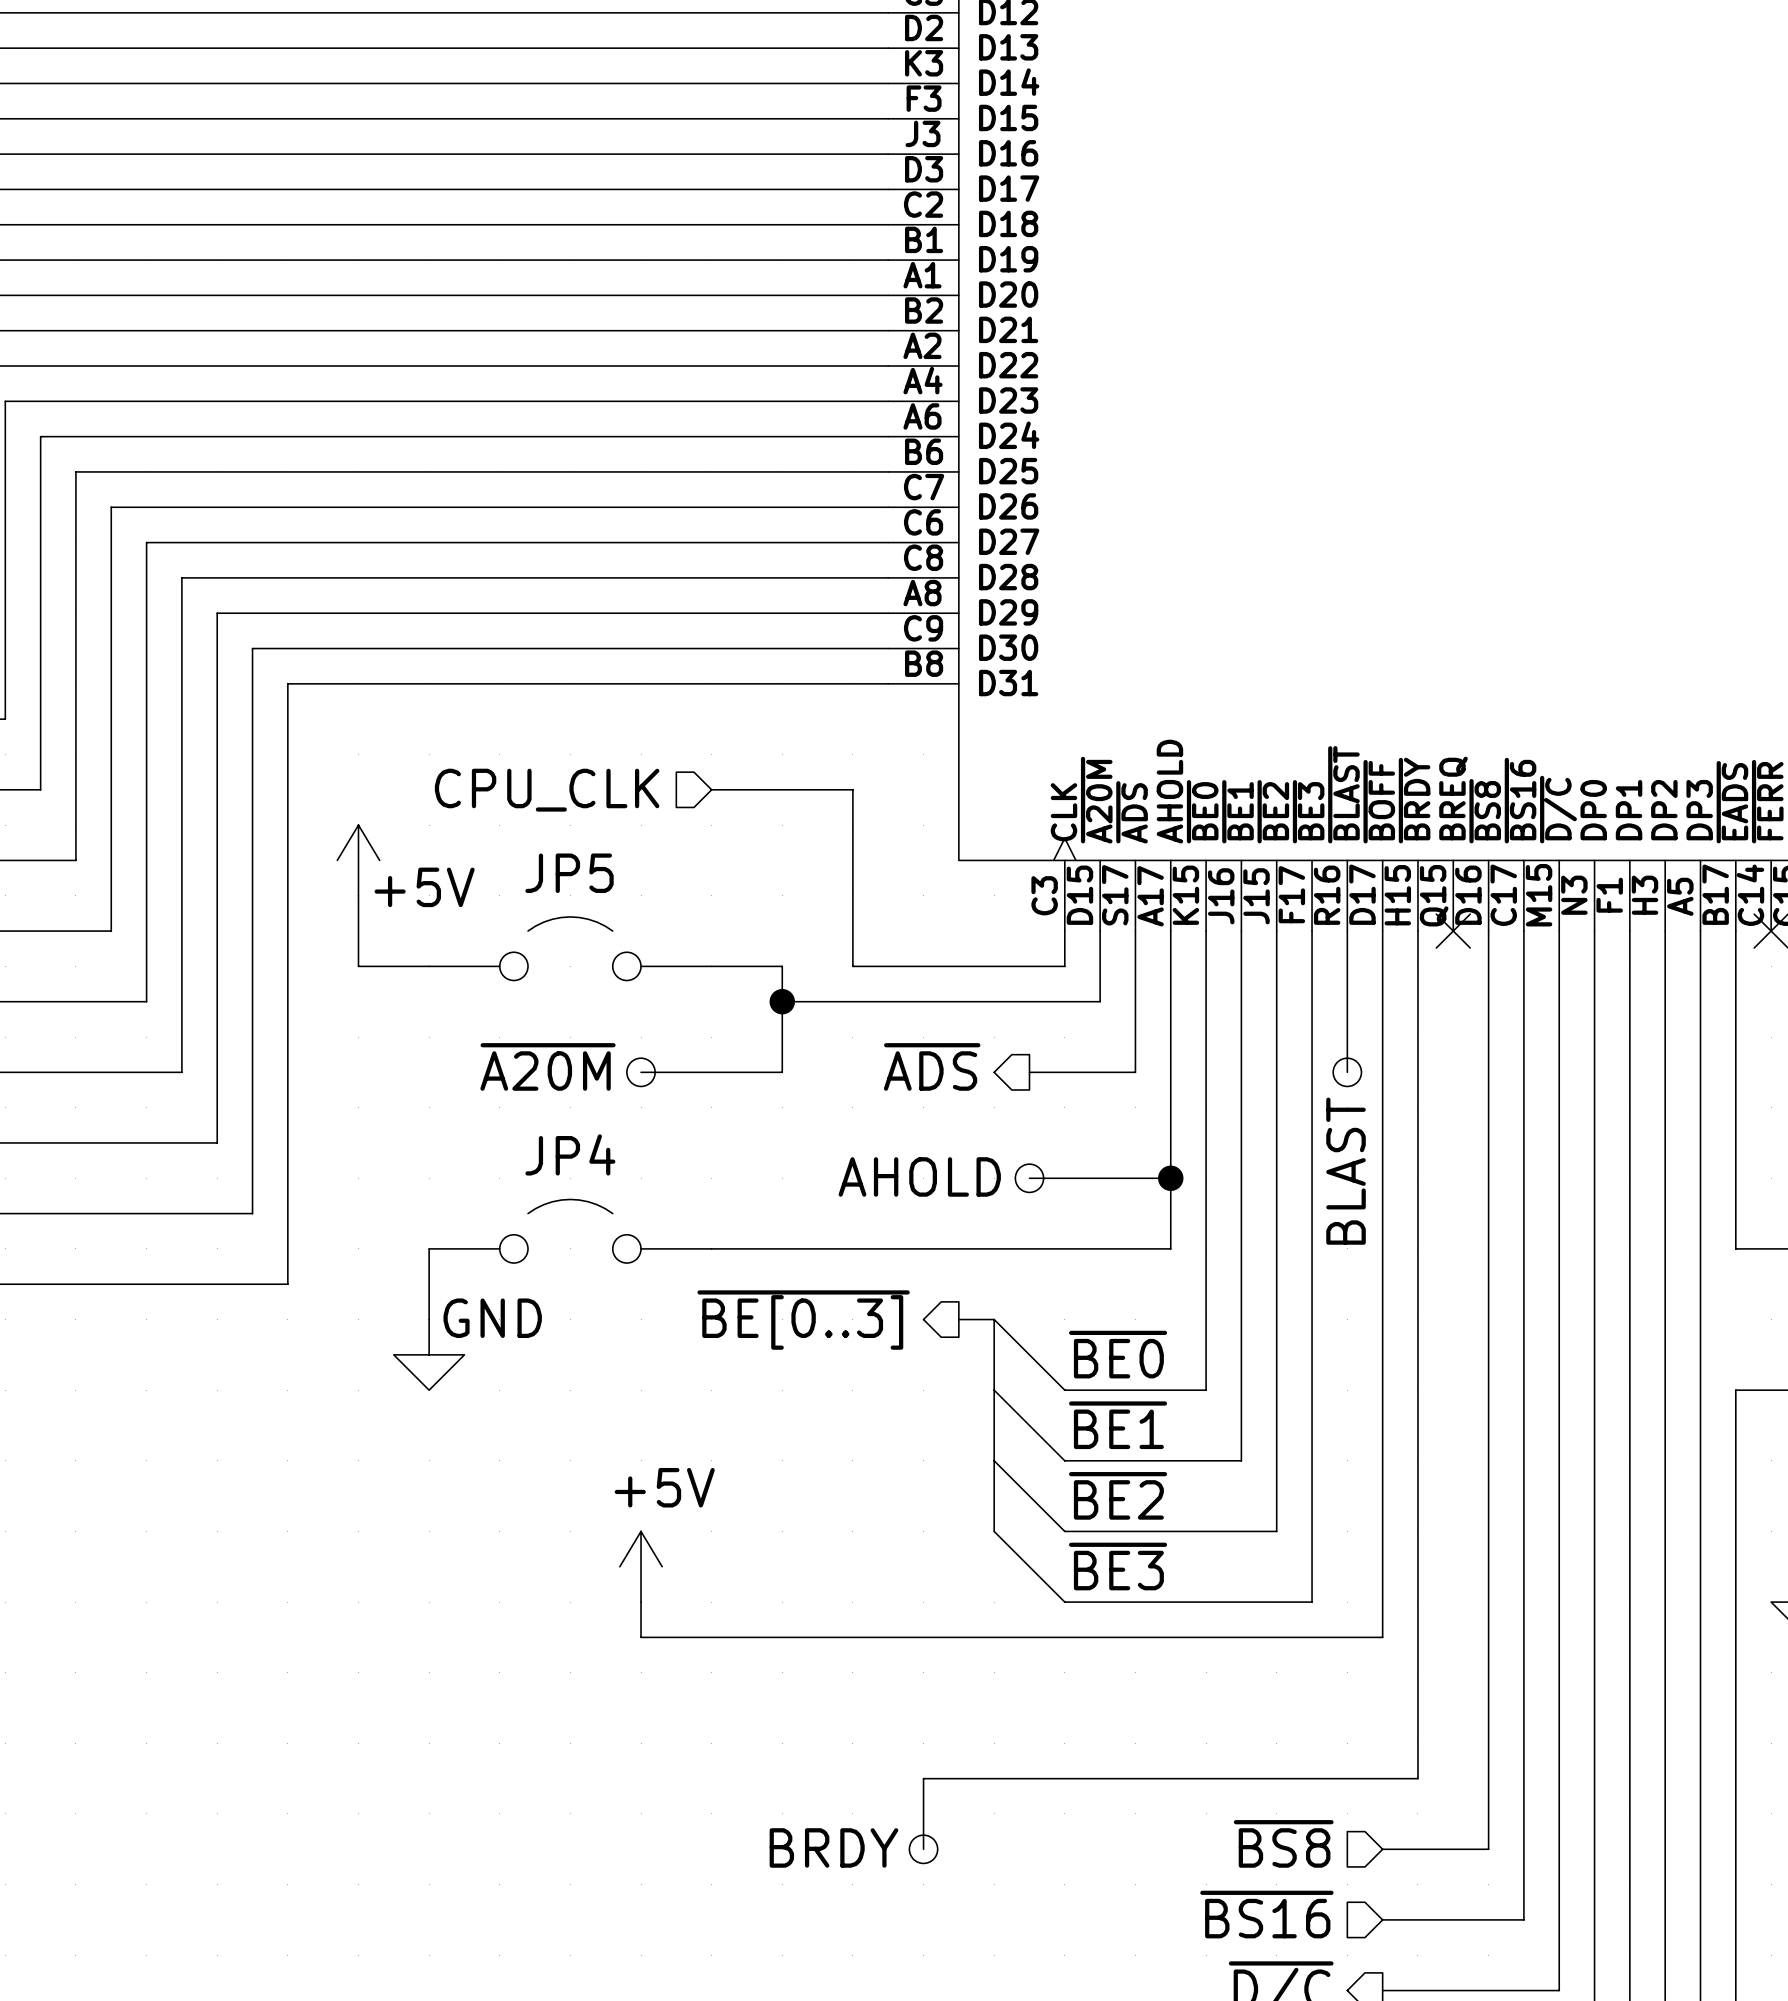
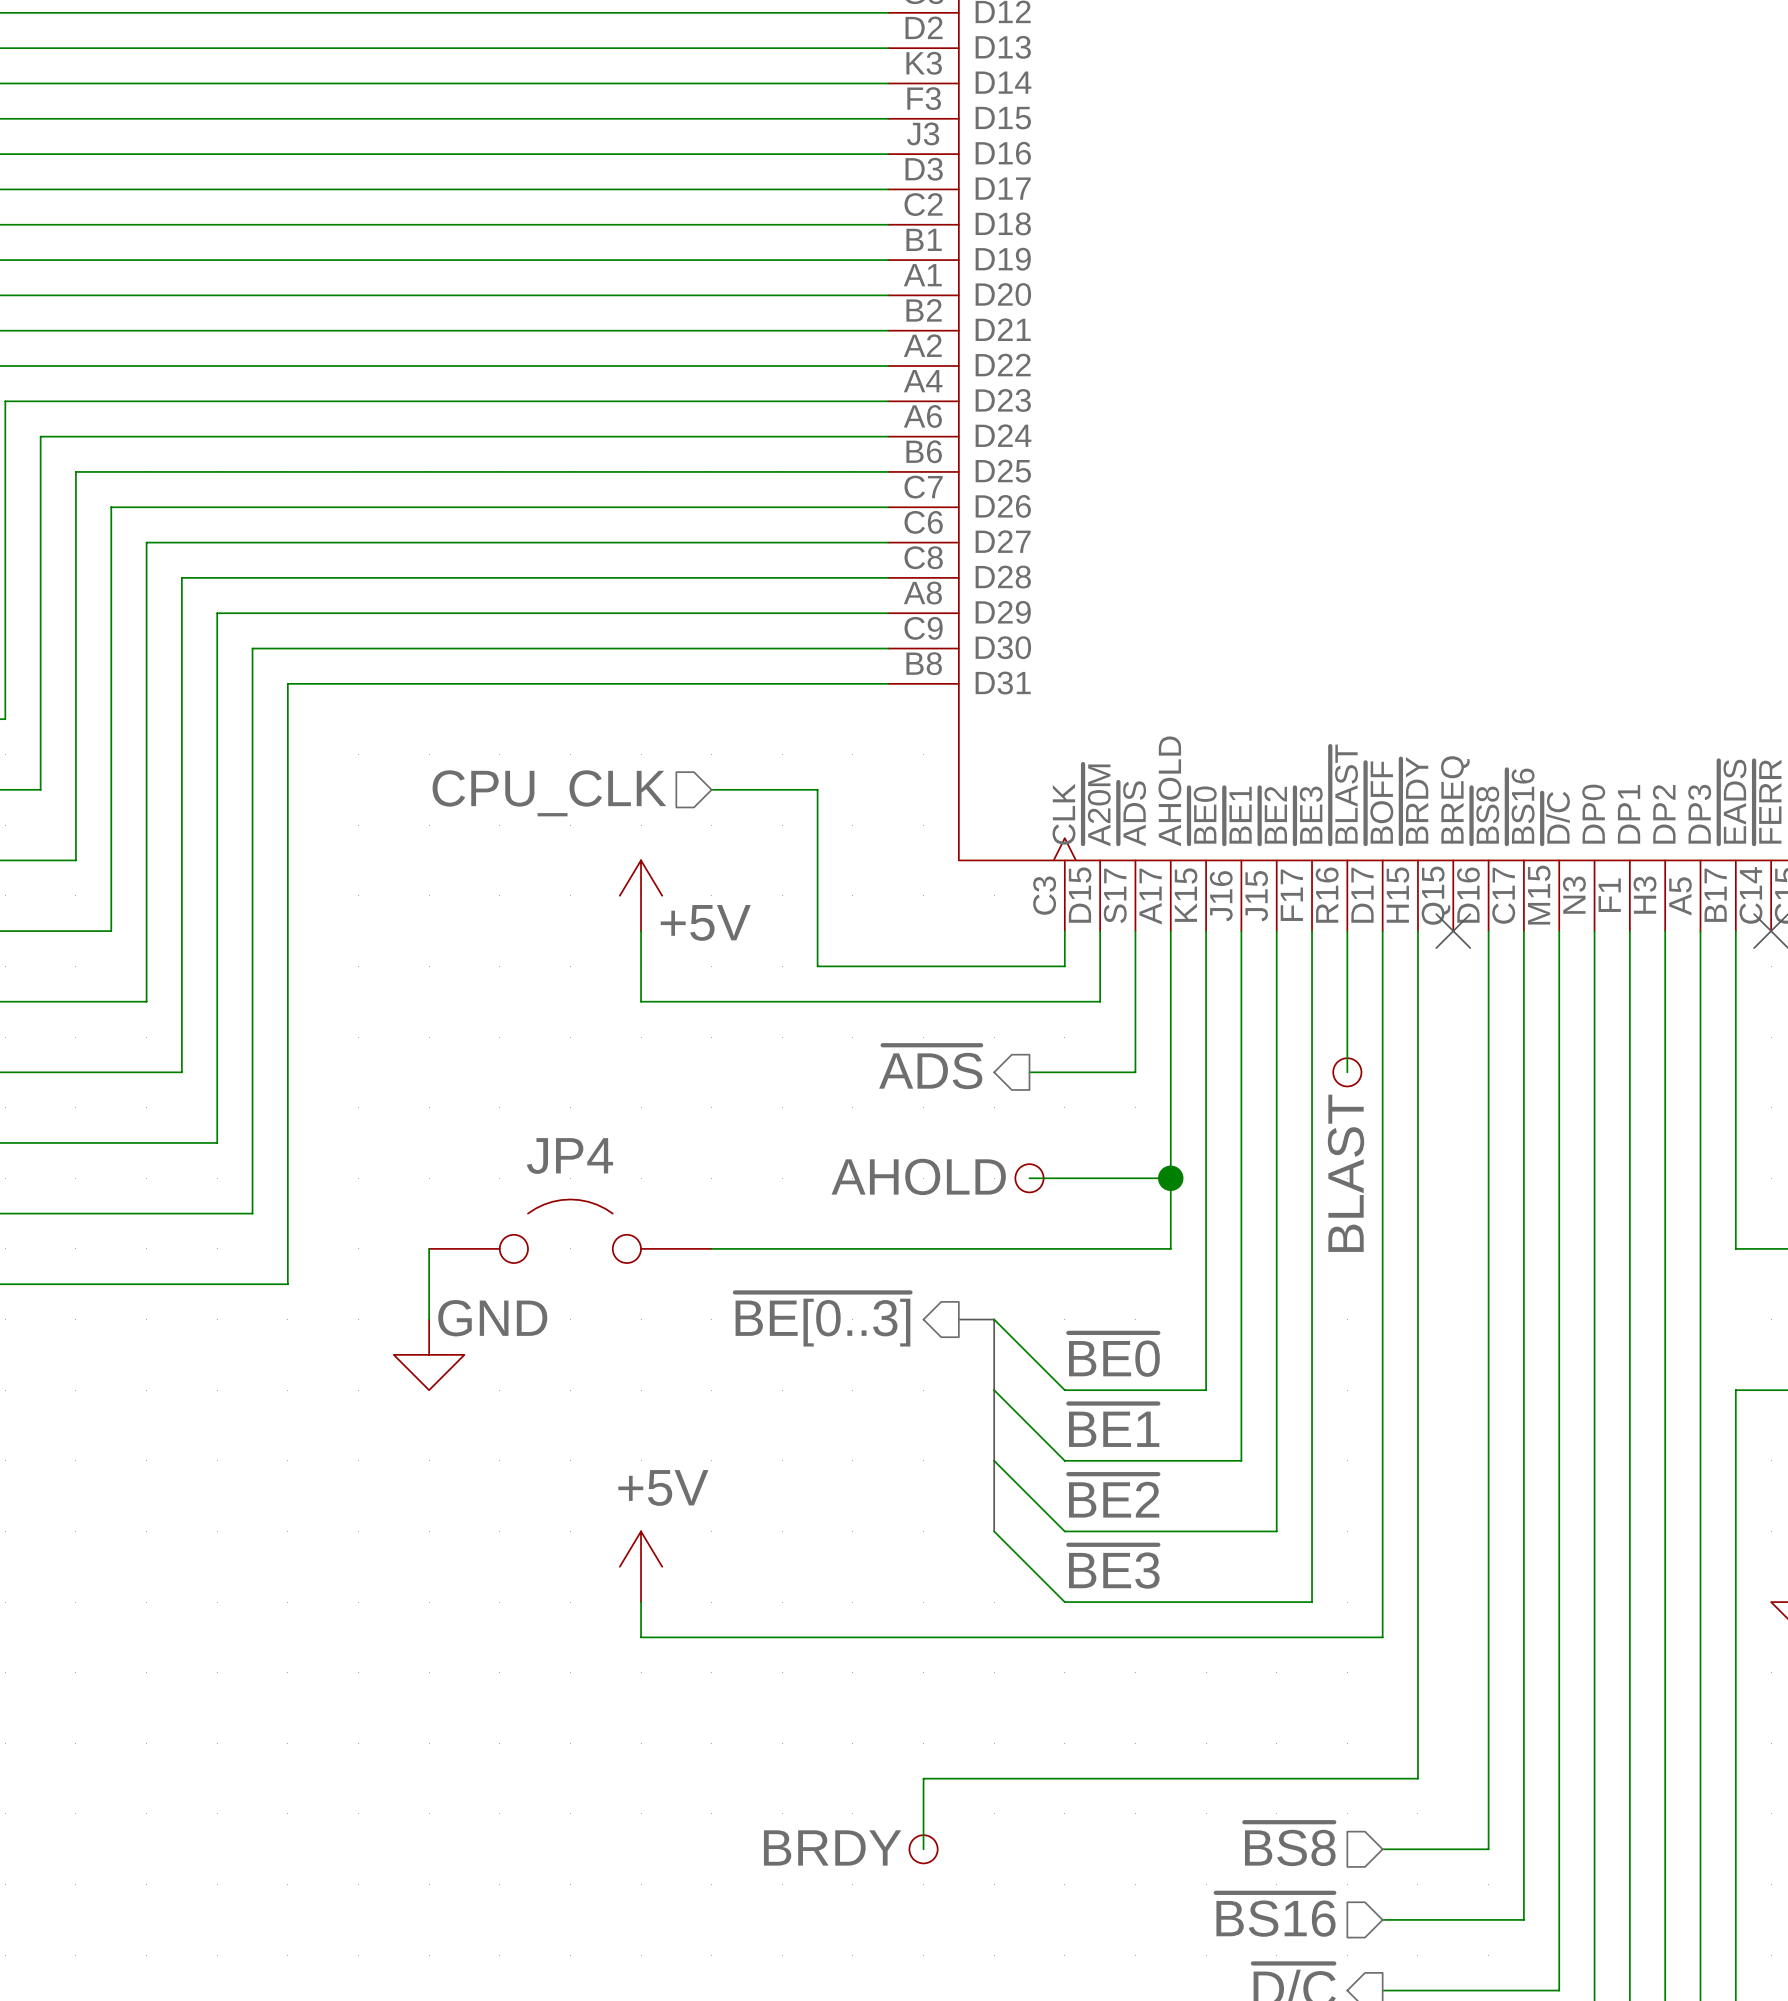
wire: (817, 789) (852, 789) (852, 966) -> (817, 789) (817, 966) (852, 966)
power symbol position: +5V (358, 860) -> +5V (641, 895)
wire: (358, 895) (358, 966) (429, 966) -> none
wire: none -> (641, 931) (641, 1001) (782, 1001)
JP5: (570, 948) -> none
wire: (711, 966) (782, 966) (782, 1072) (641, 1072) -> none
junction: (782, 1001) -> none
part: ~{A20M} (641, 1072) -> none

